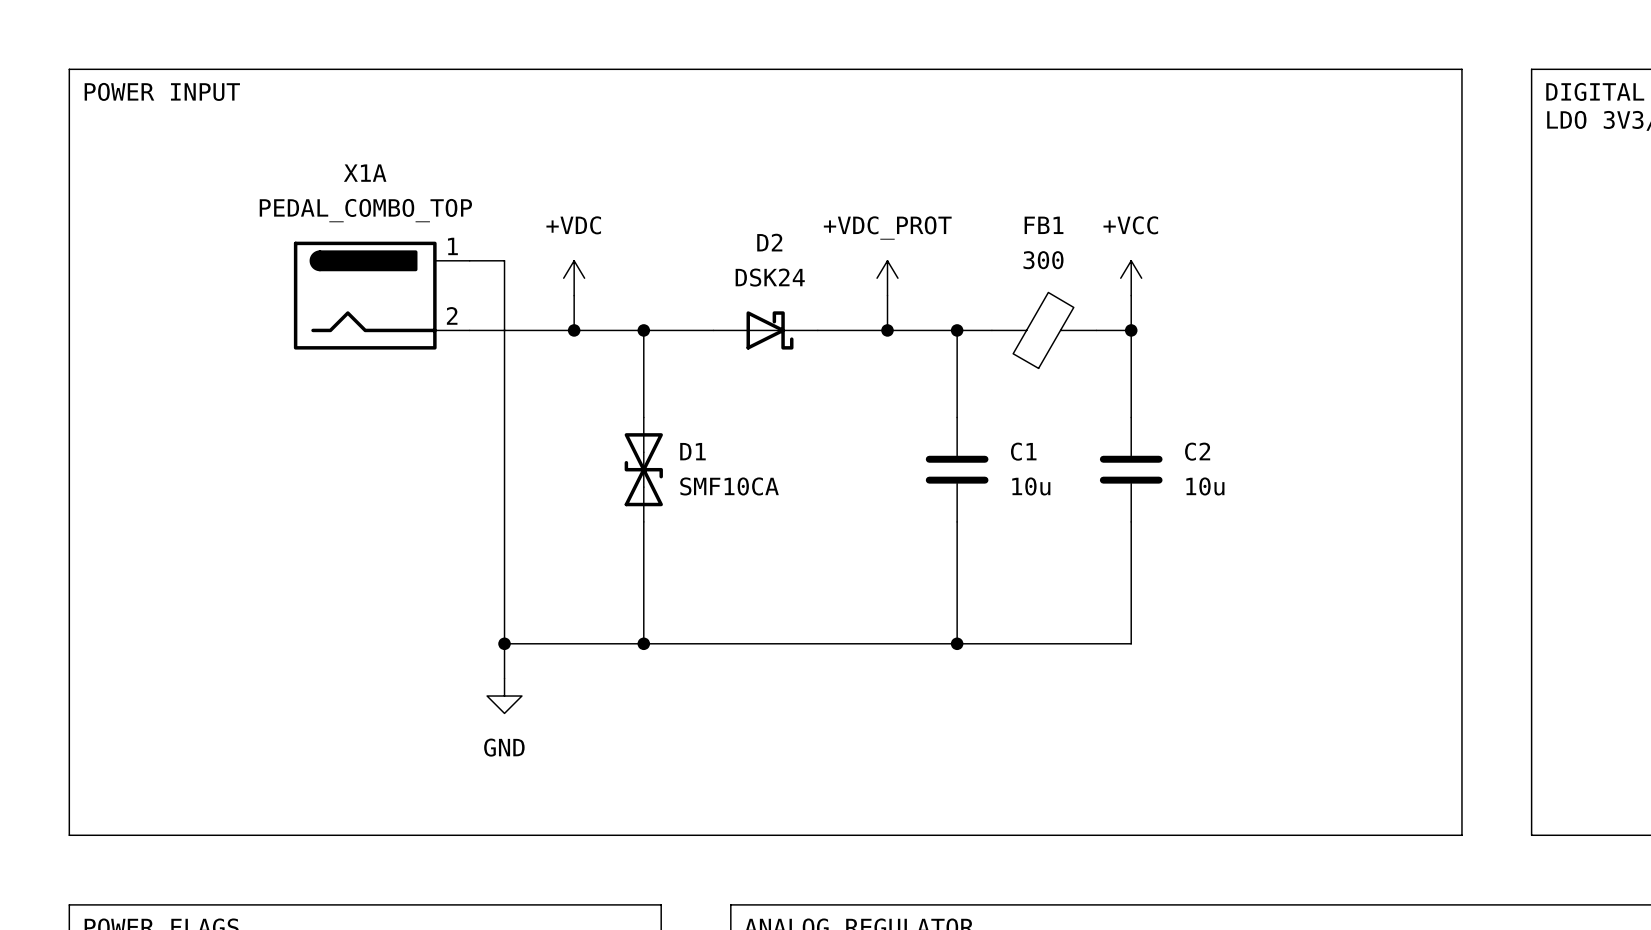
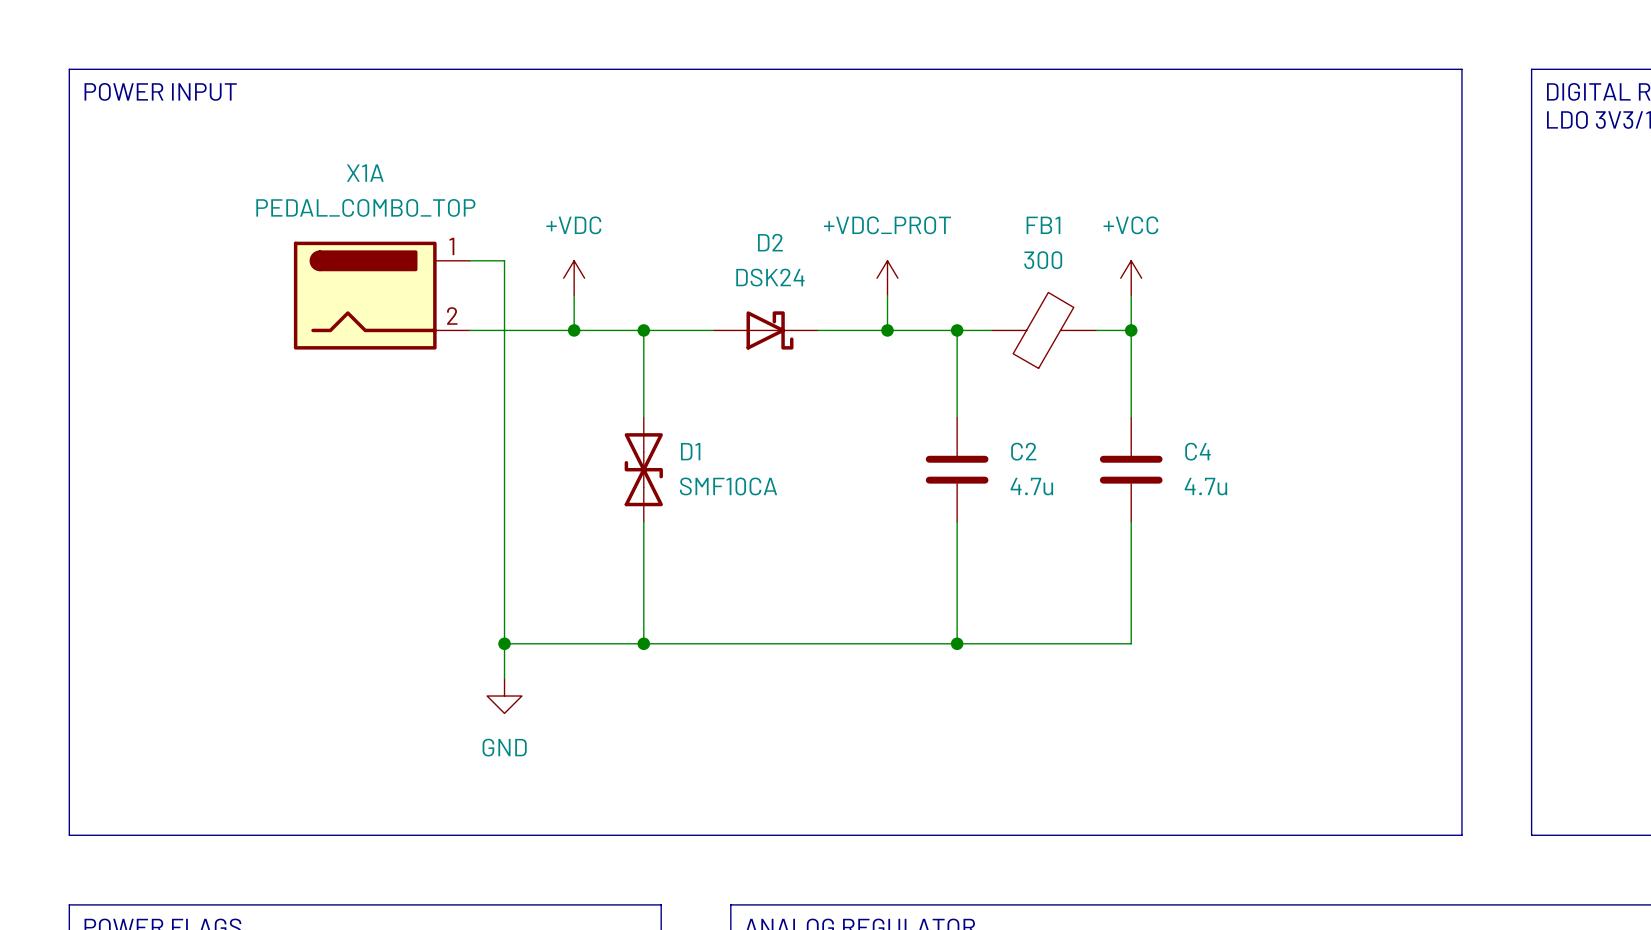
C1 name: C1 (1023, 451) -> C2 (1023, 451)
C2 name: C2 (1197, 451) -> C4 (1197, 451)
C1 value: 10u (1031, 486) -> 4.7u (1031, 486)
C2 value: 10u (1205, 486) -> 4.7u (1205, 486)

